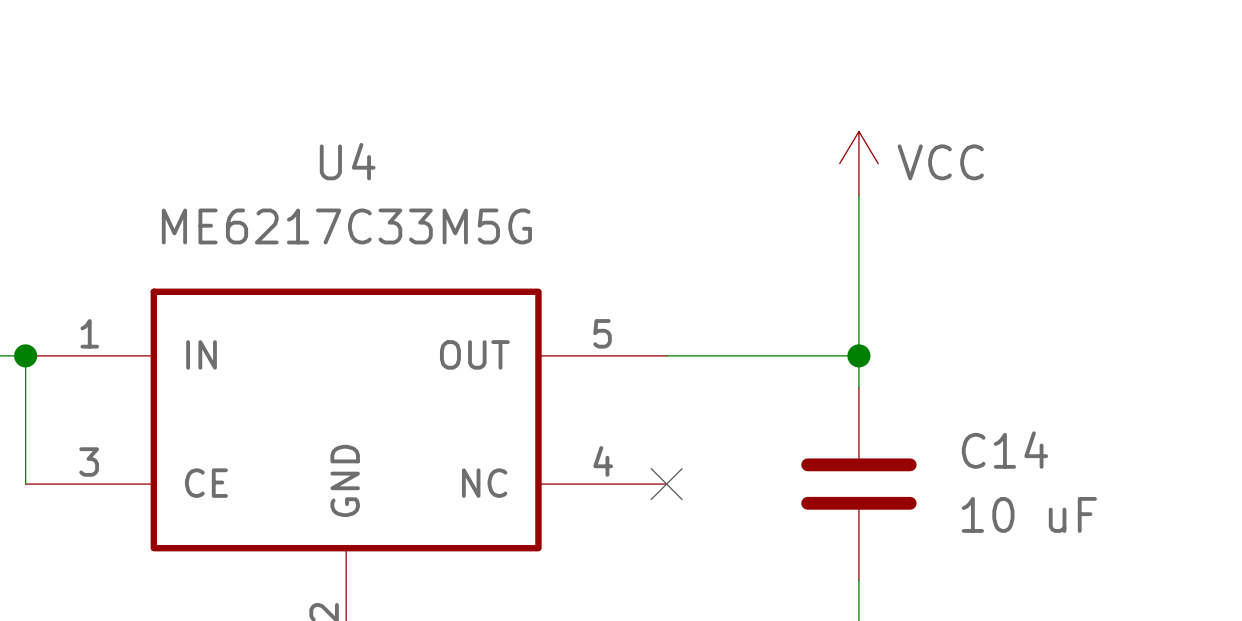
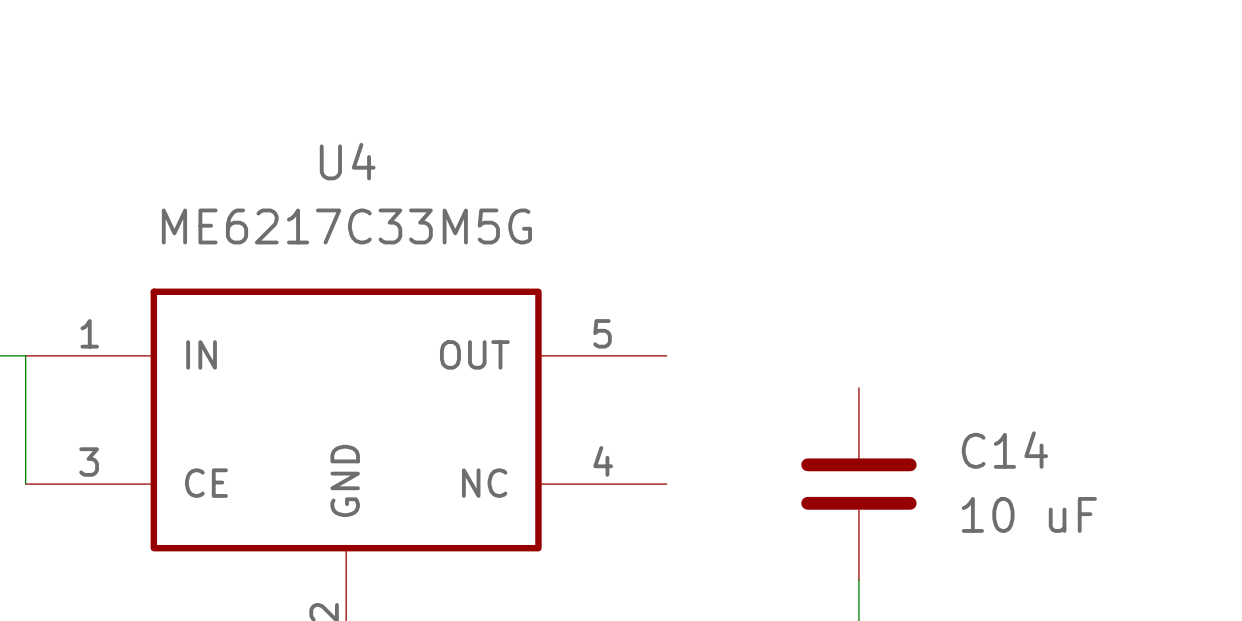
power symbol: VCC (858, 163) -> none
wire: (858, 195) (858, 387) -> none
junction: (25, 355) -> none
wire: (666, 355) (858, 355) -> none
junction: (858, 355) -> none
no-connect mark: (666, 484) -> none

